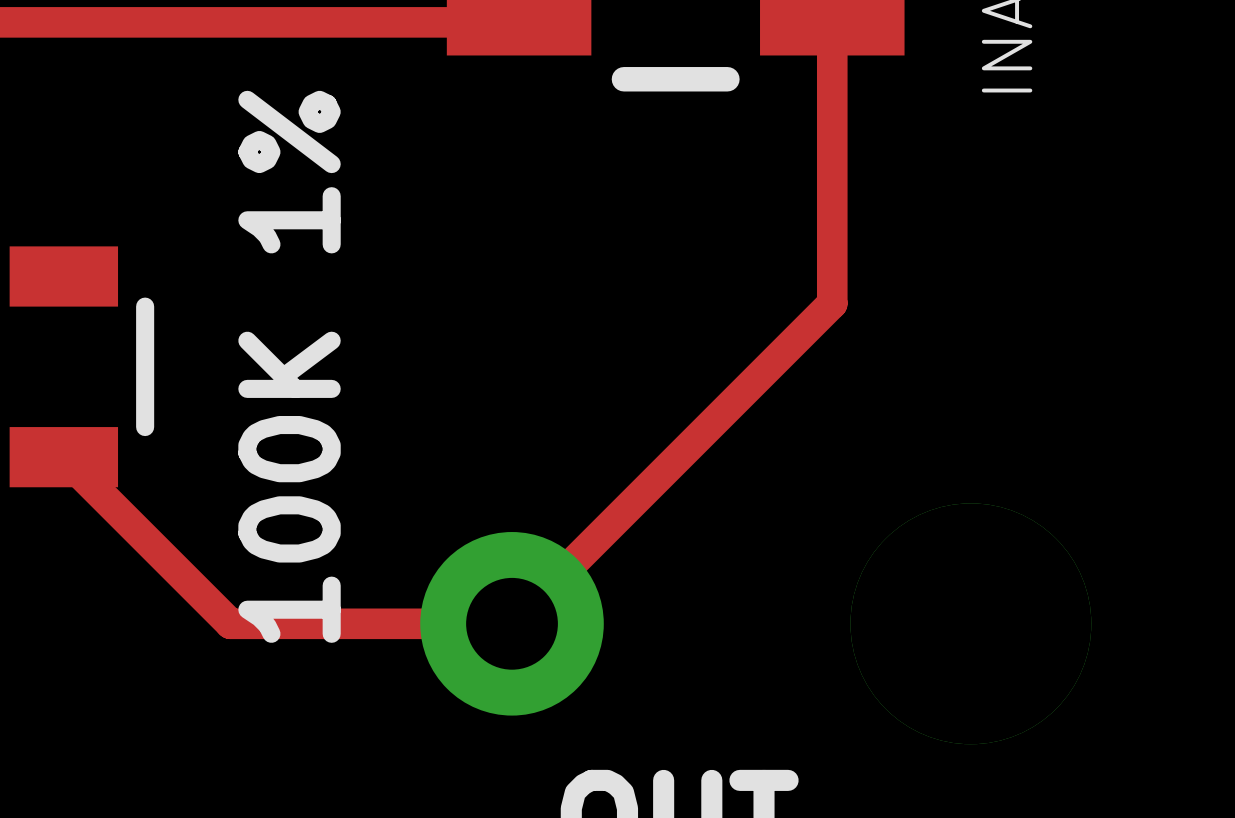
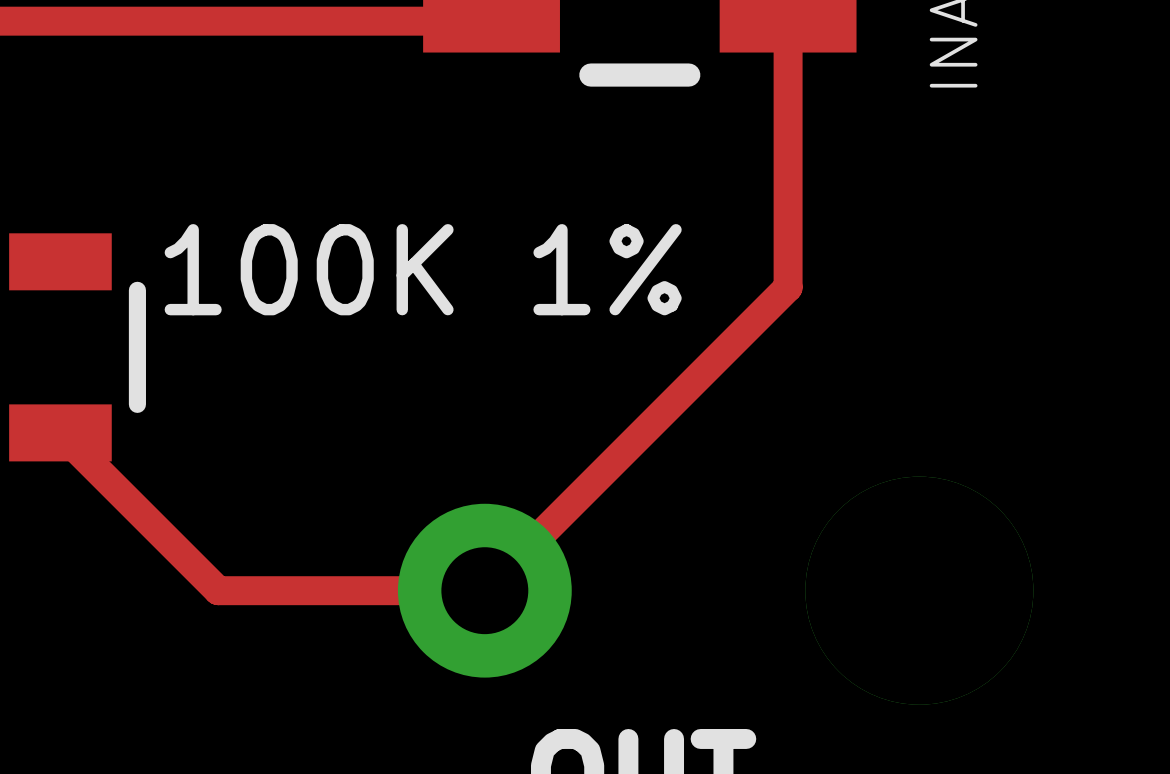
part value rotation: 0° (289, 366) -> 90° clockwise (423, 269)

